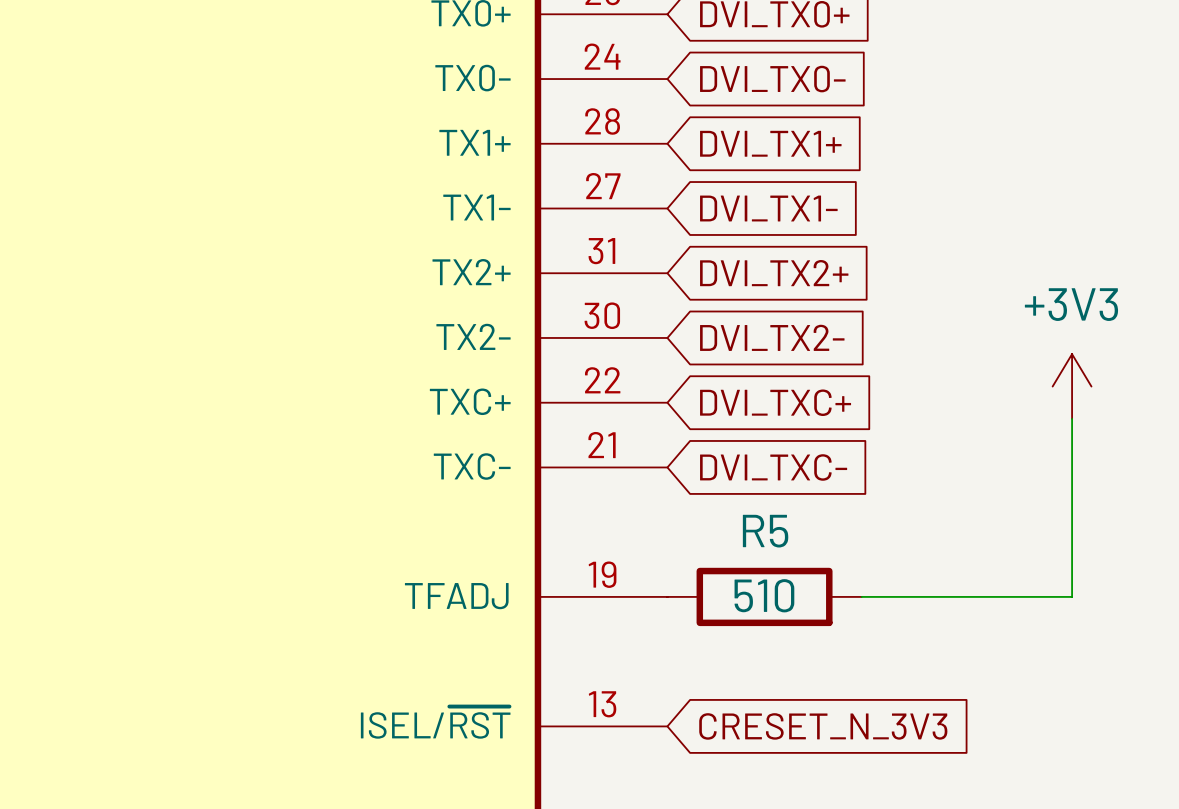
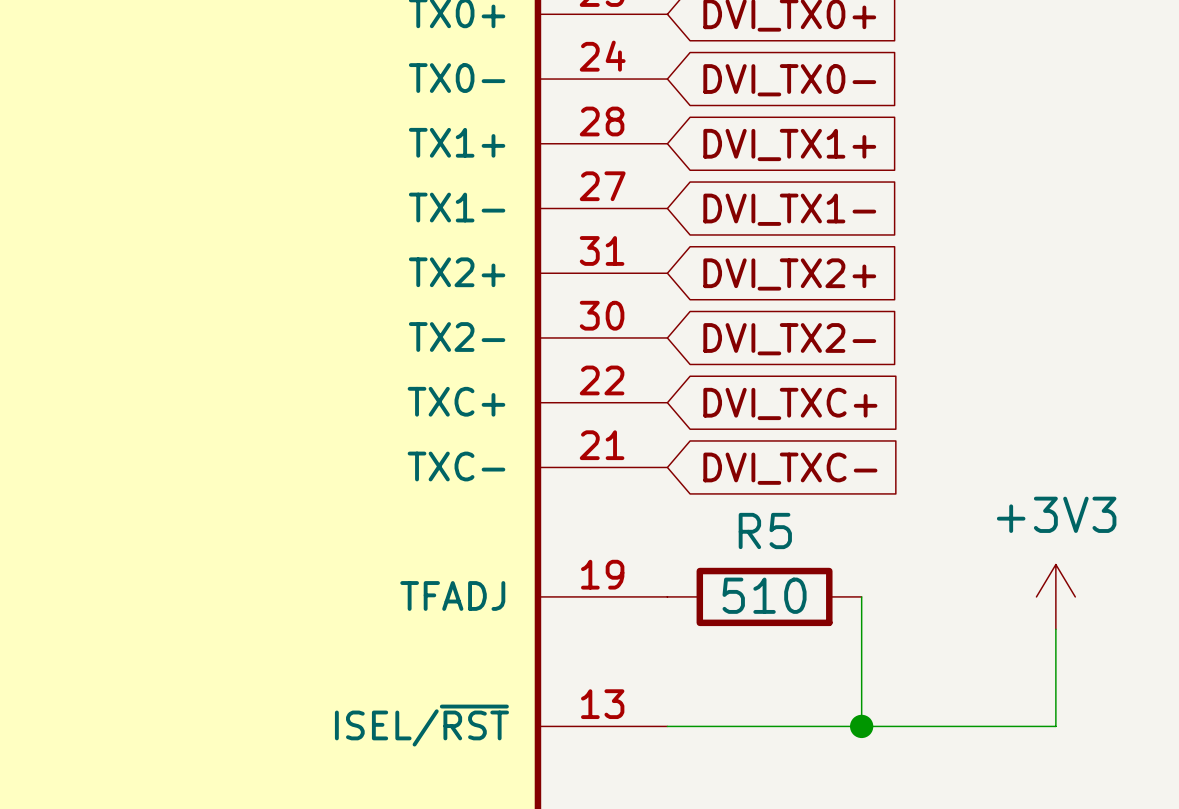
power symbol position: +3V3 (1072, 386) -> +3V3 (1055, 596)
wire: (1072, 418) (1072, 596) (861, 596) -> (861, 726) (861, 596)
wire: none -> (1055, 629) (1055, 726) (667, 726)
global label: CRESET_N_3V3 (823, 726) -> none
junction: none -> (861, 726)

